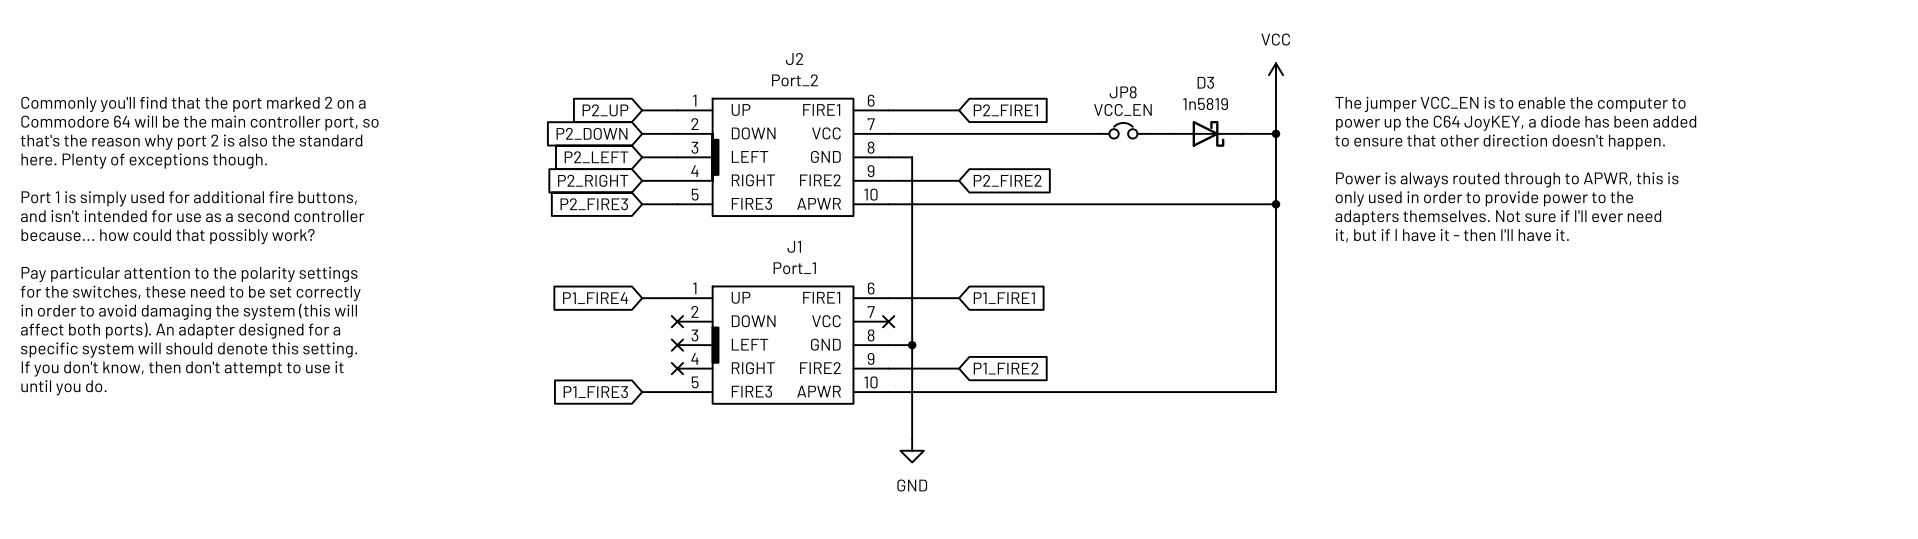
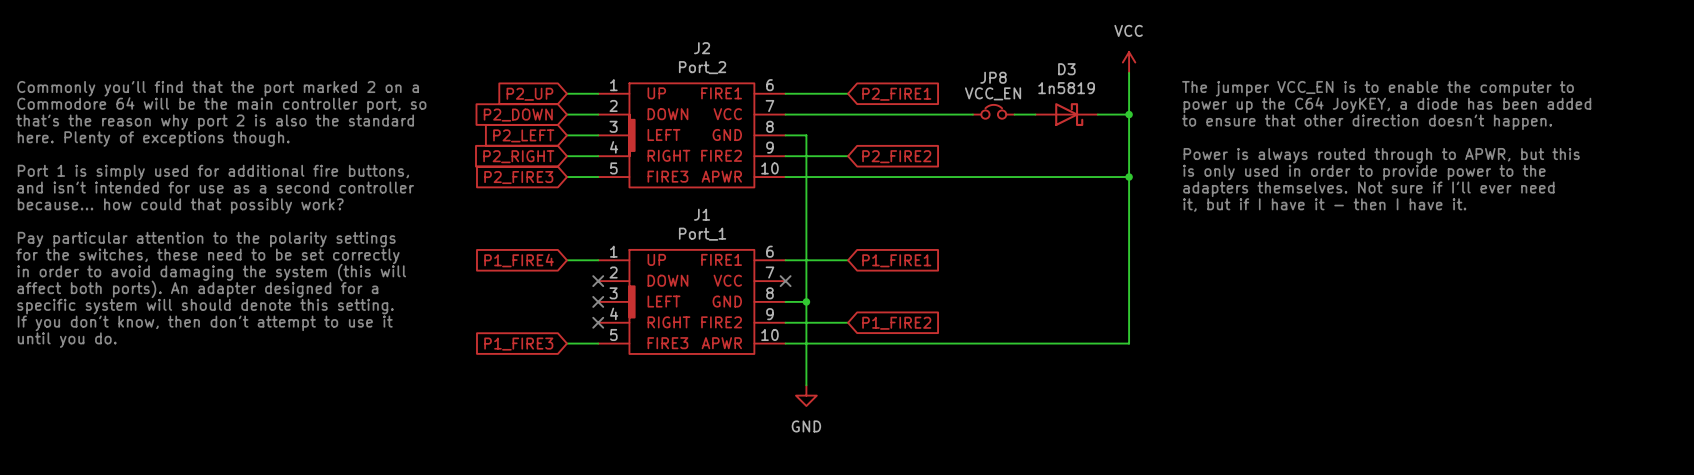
text: Power is always routed through to APWR, this is (1507, 179) -> Power is always routed through to APWR, but this (1381, 155)
text: only used in order to provide power to the (1484, 198) -> is only used in order to provide power to the (1364, 172)
text: it, but if I have it - then I'll have it. (1452, 235) -> it, but if I have it - then I have it. (1324, 205)

